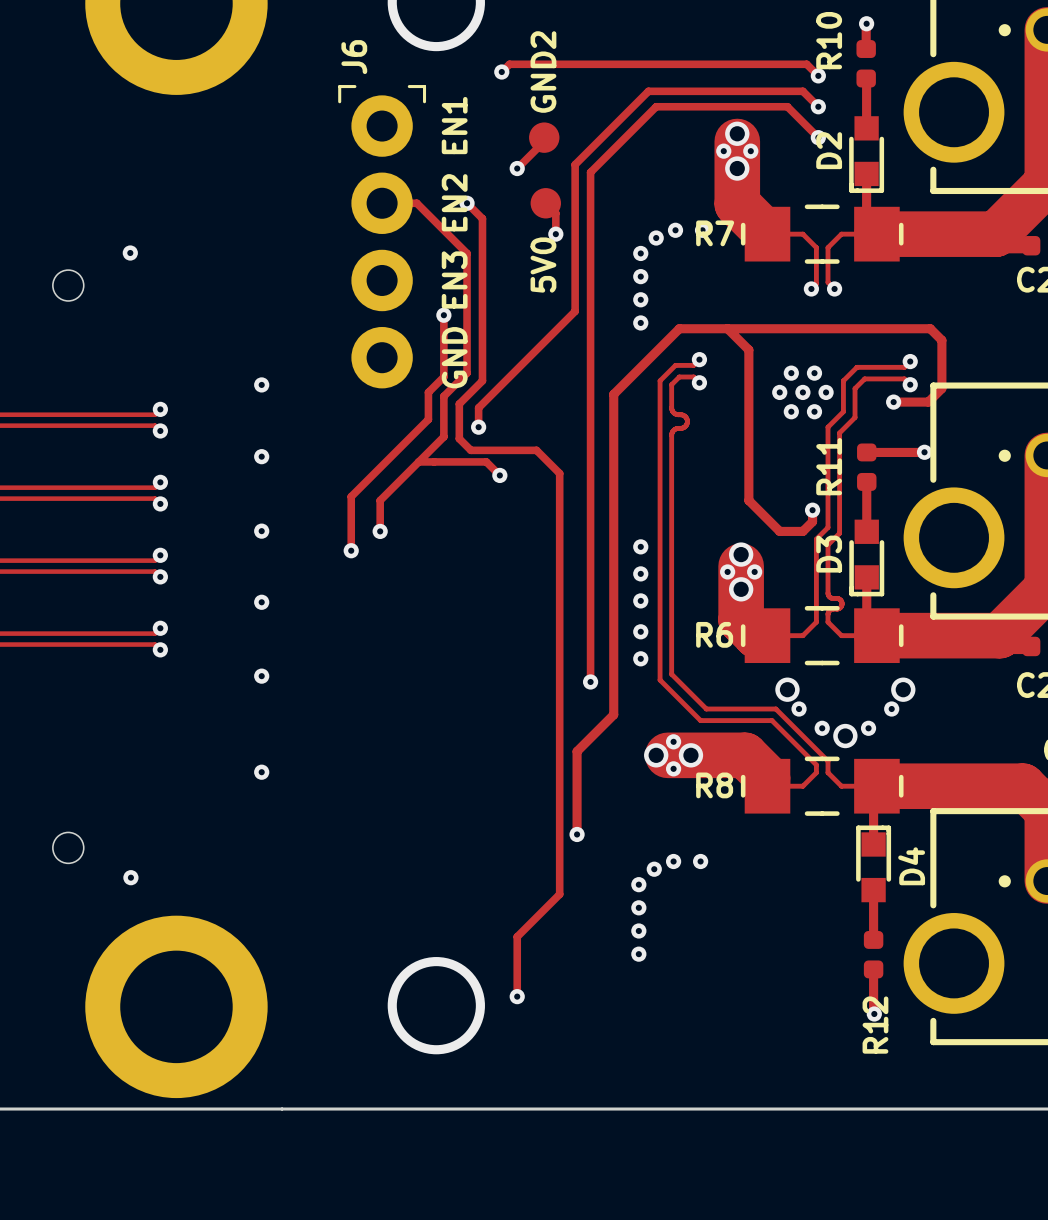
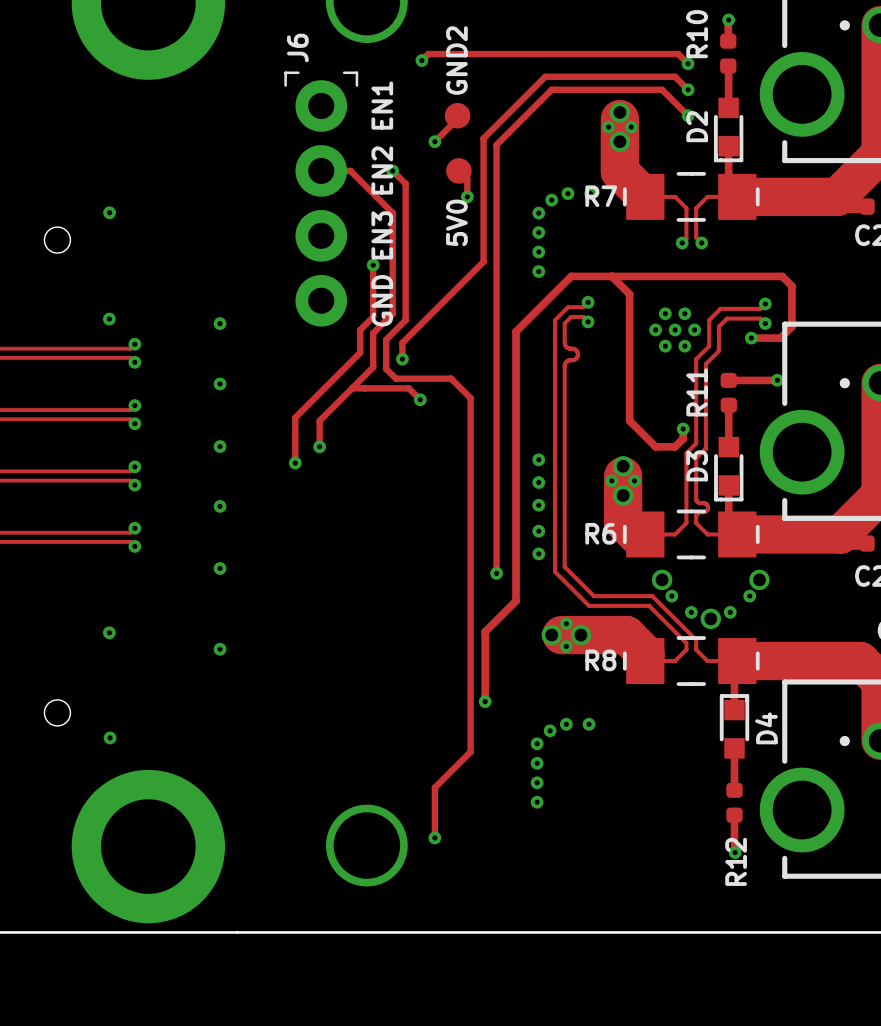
via: none -> (109, 319)
via: none -> (109, 632)

